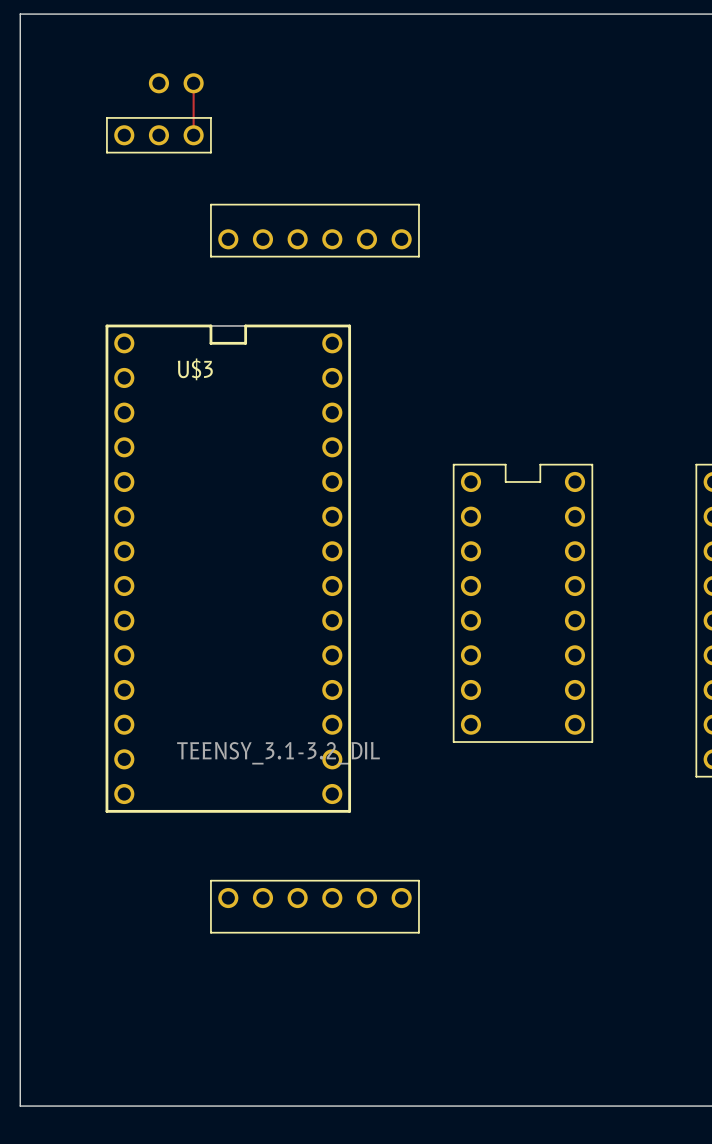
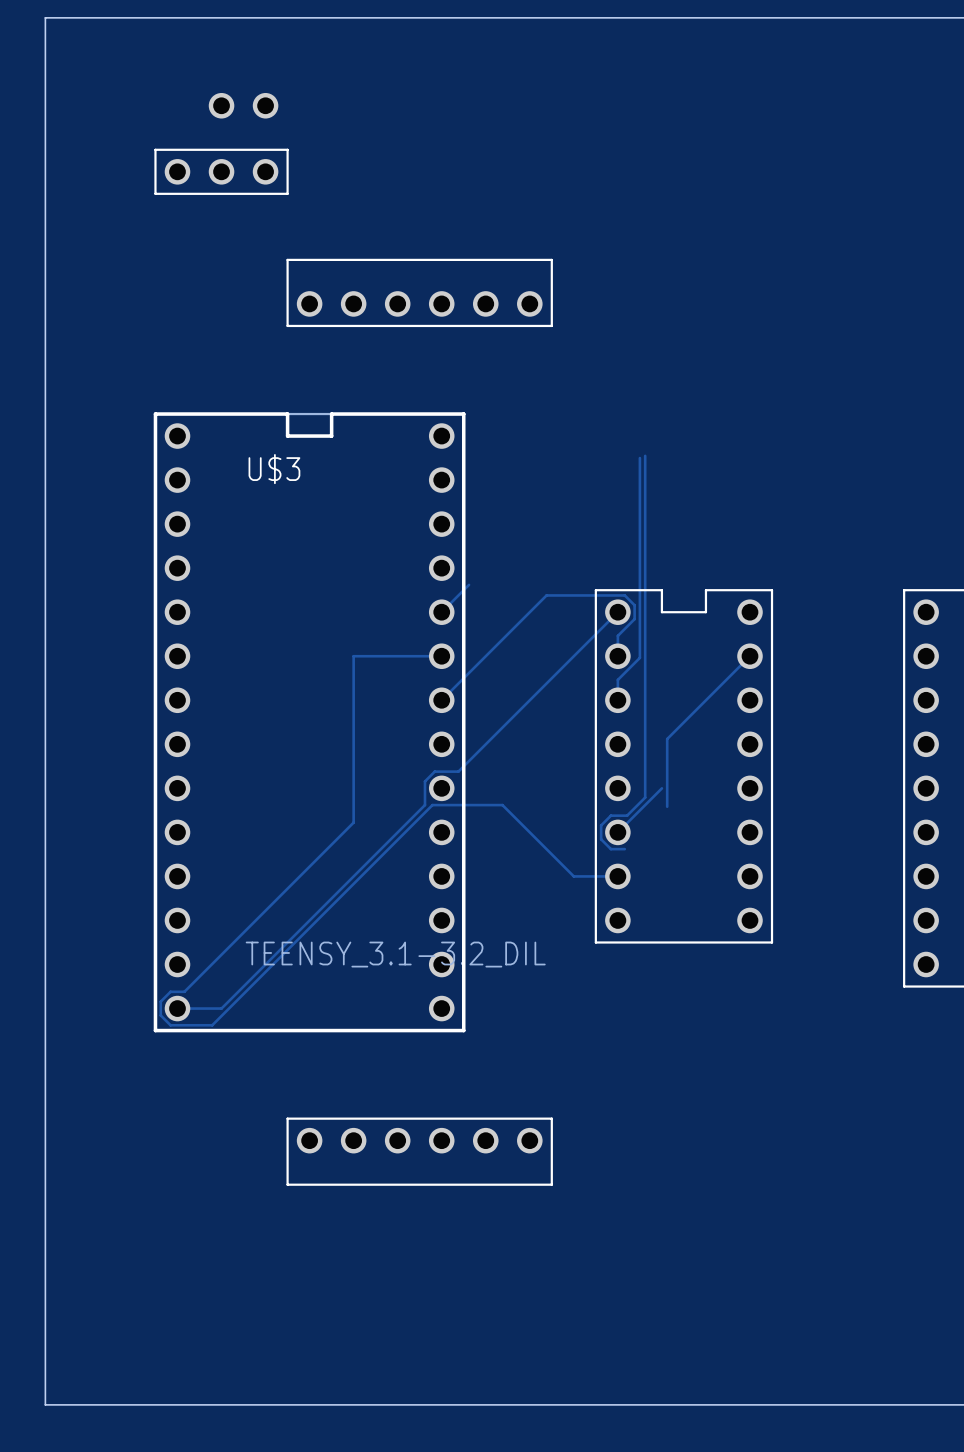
track: (193, 83) (193, 135) -> none
track: none -> (645, 455) (645, 797) (627, 815) (610, 815) (601, 825) (601, 839) (610, 849) (624, 849)
track: none -> (639, 458) (639, 657) (617, 679) (617, 700)
track: none -> (469, 584) (441, 612)
track: none -> (617, 612) (458, 771) (434, 771) (424, 781) (424, 805) (221, 1008) (177, 1008)
track: none -> (441, 656) (353, 656) (353, 822) (184, 991) (170, 991) (160, 1001) (160, 1015) (170, 1025) (212, 1025) (432, 805) (502, 805) (573, 876) (617, 876)
track: none -> (617, 656) (617, 635) (634, 619) (634, 605) (624, 595) (546, 595) (441, 700)
track: none -> (749, 656) (667, 739) (667, 806)
track: none -> (661, 788) (617, 832)

